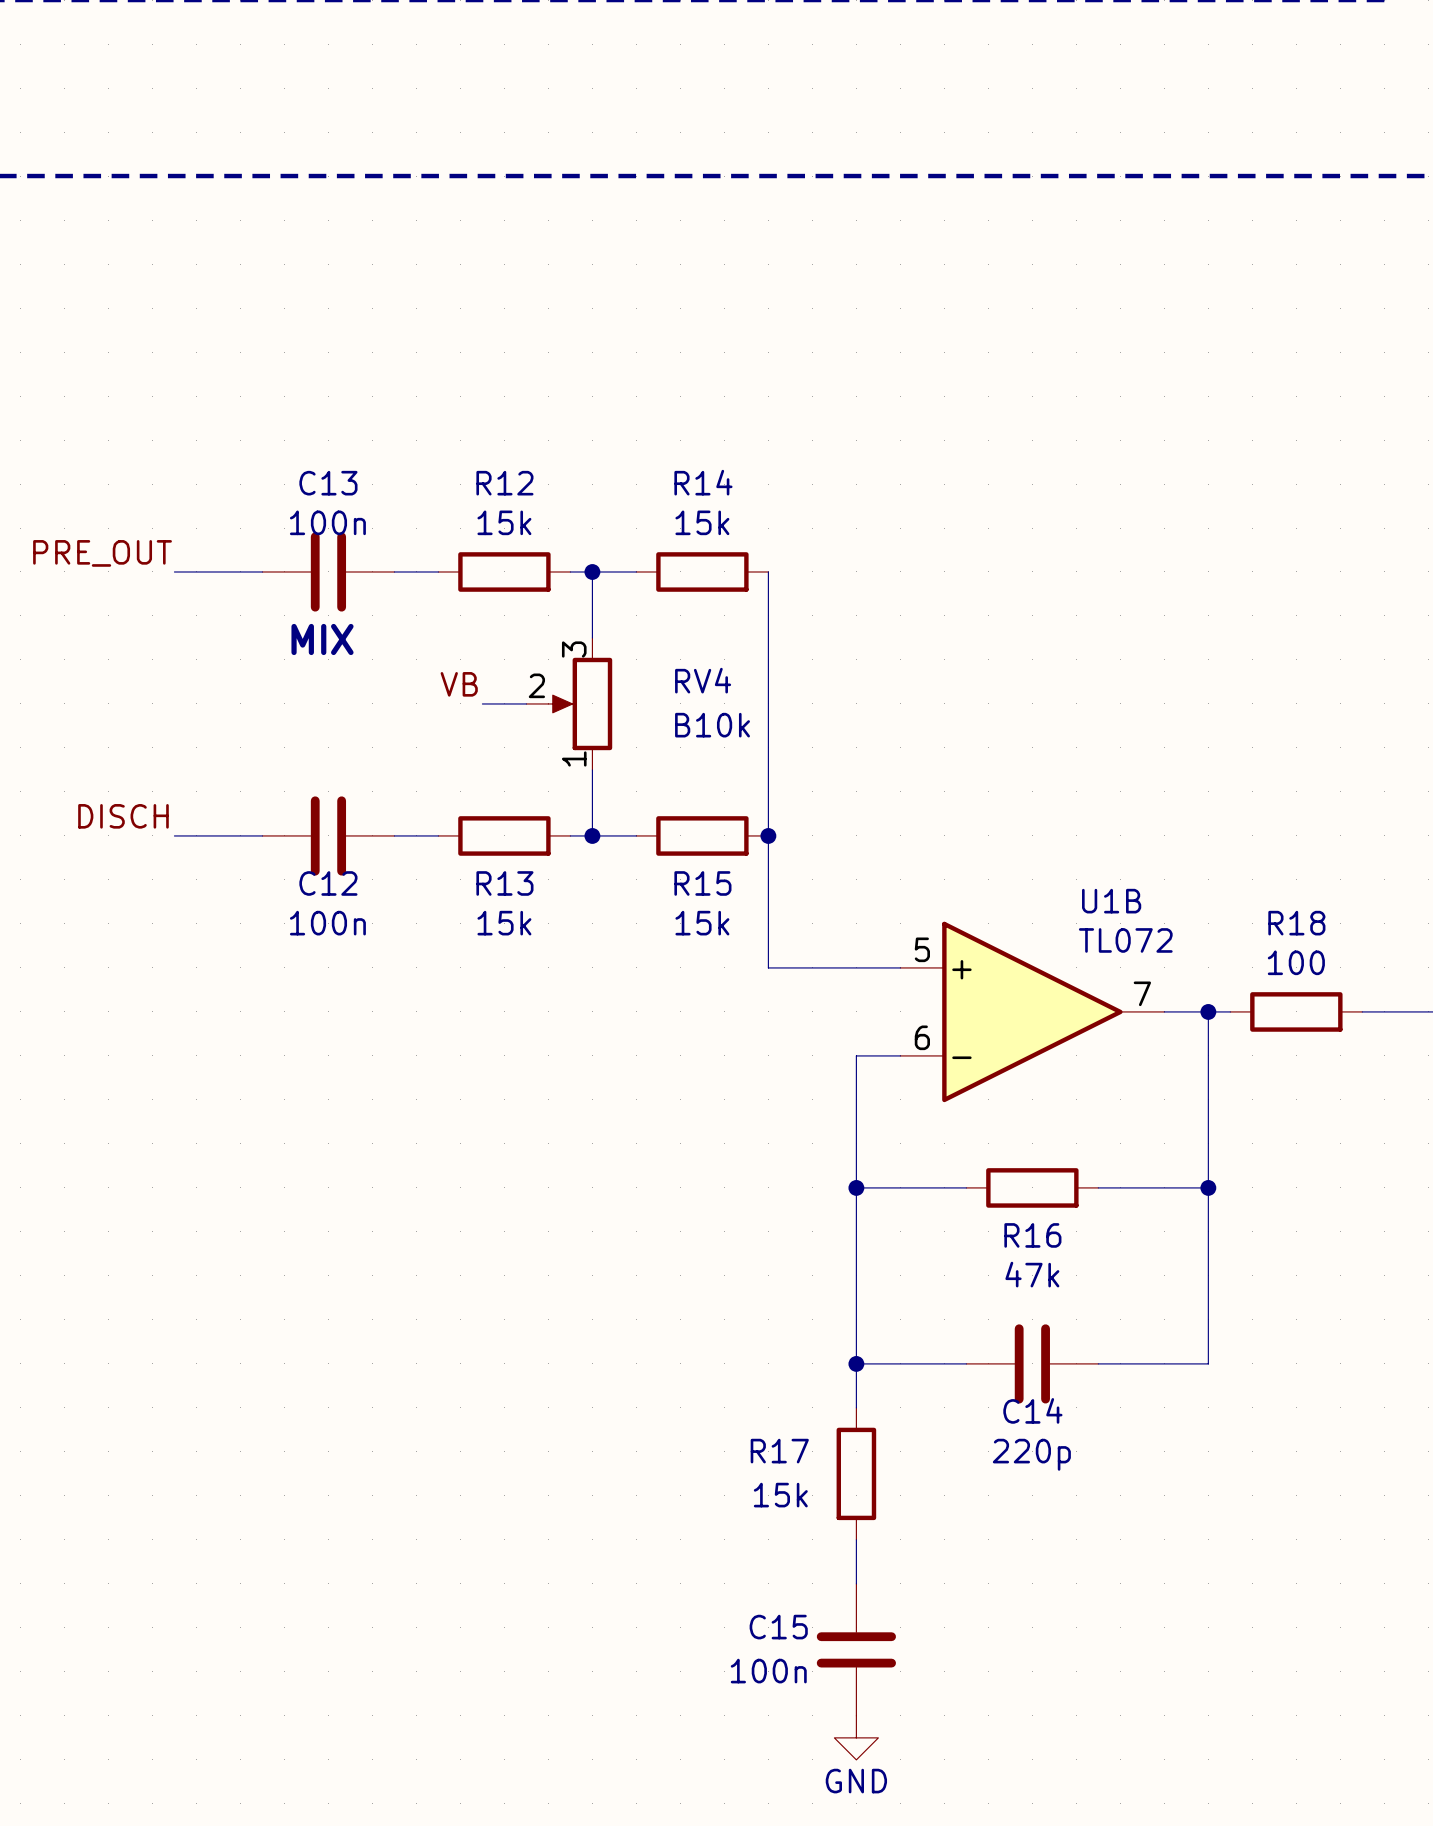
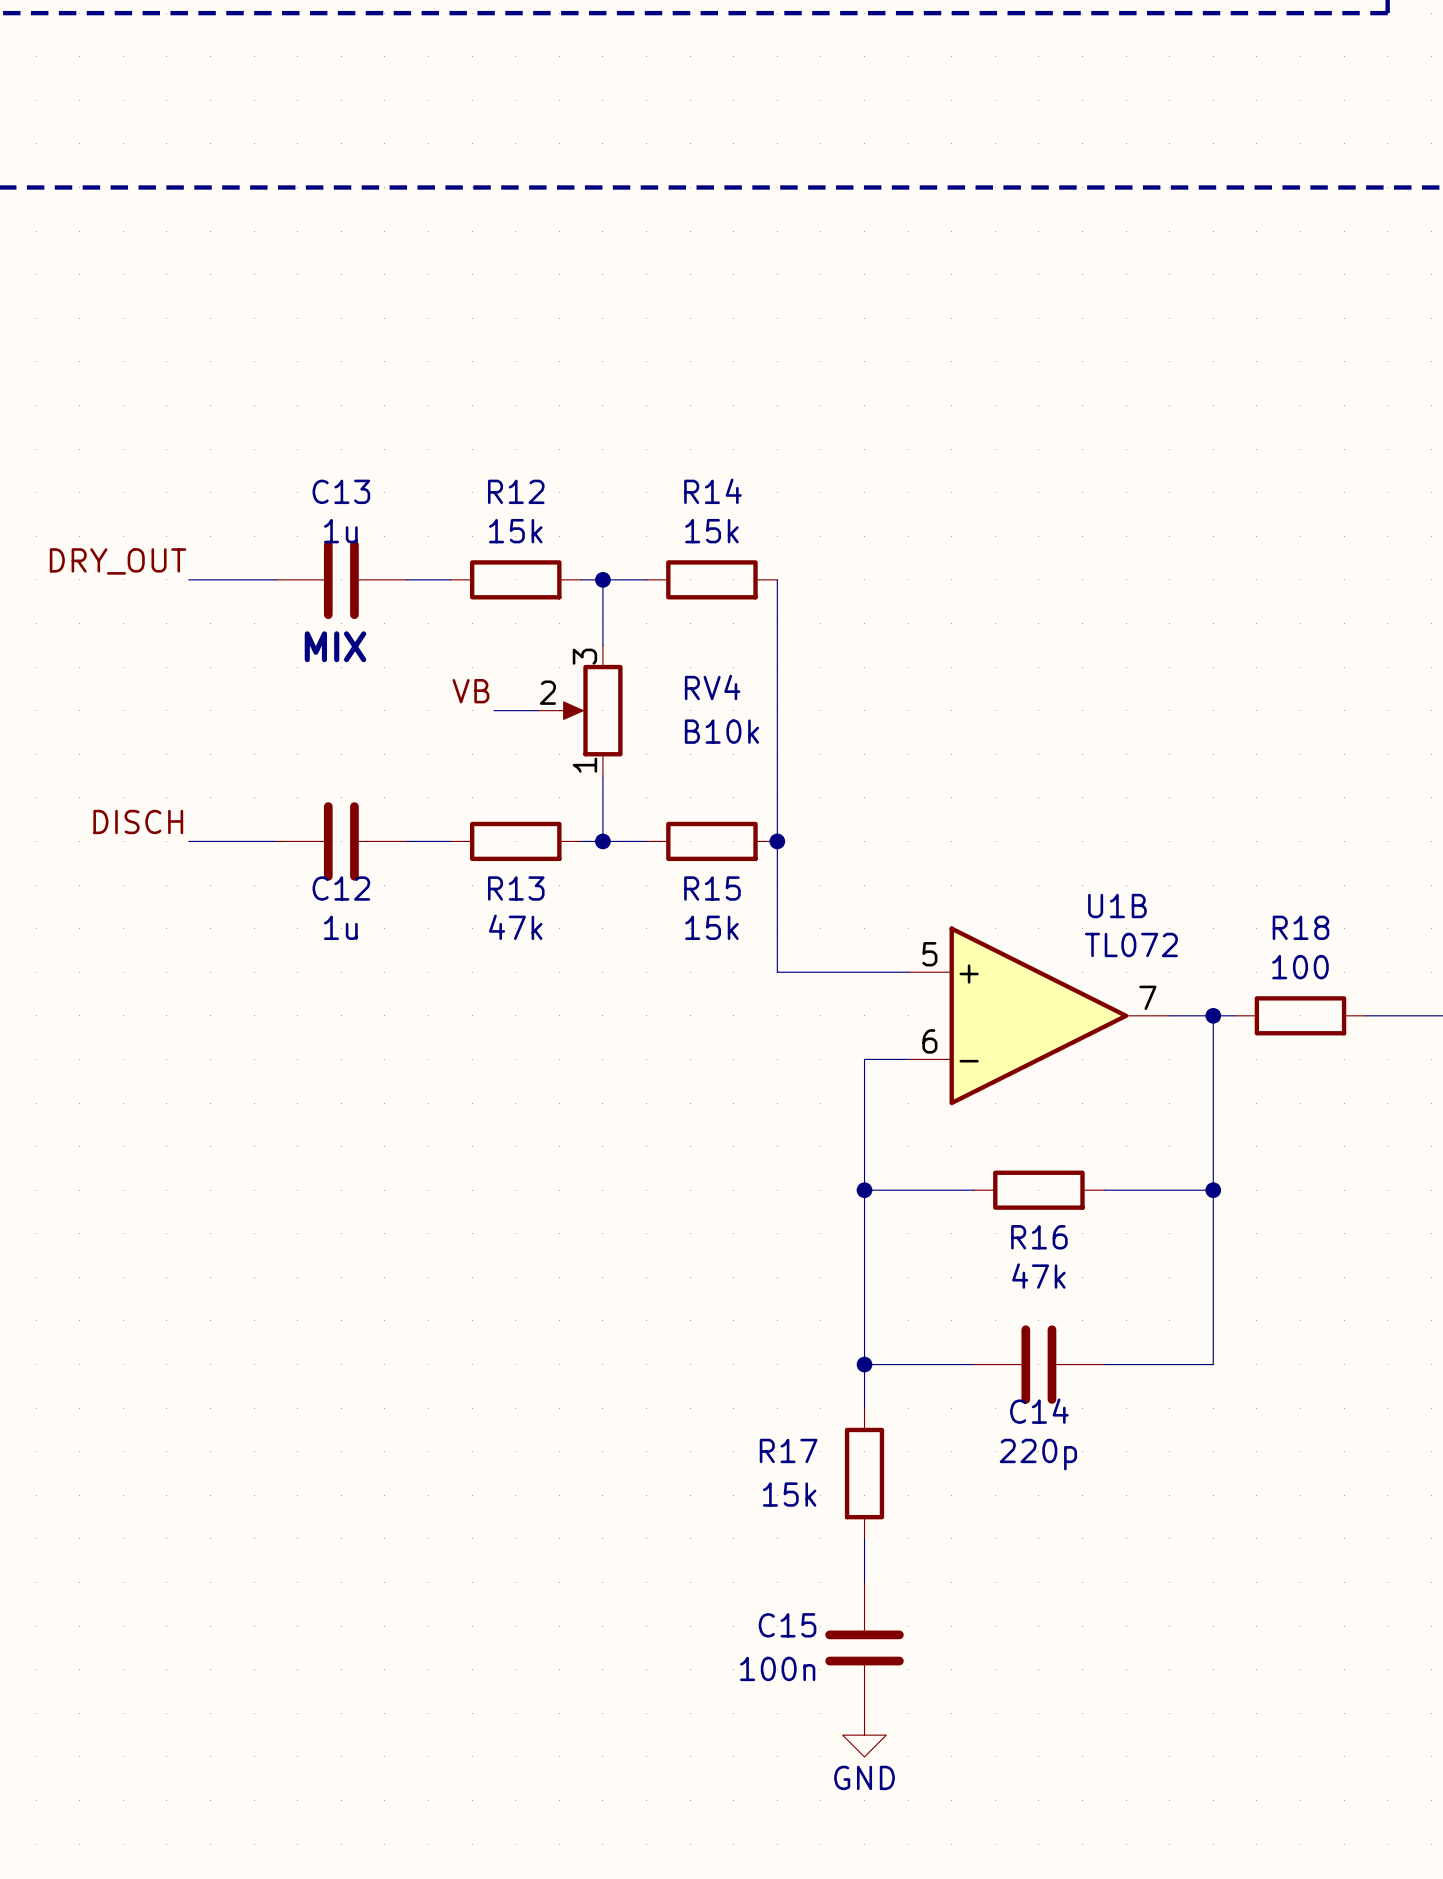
C13 value: 100n (327, 522) -> 1u (340, 531)
label: PRE_OUT (102, 553) -> DRY_OUT (118, 561)
C12 value: 100n (327, 923) -> 1u (340, 927)
R13 value: 15k (504, 923) -> 47k (515, 927)

